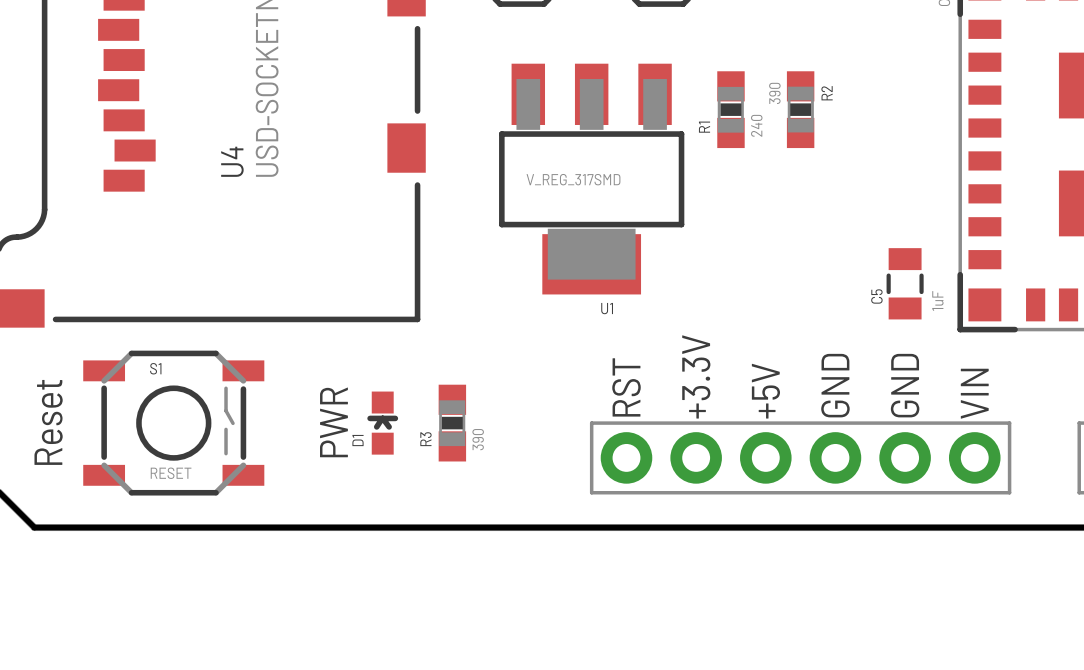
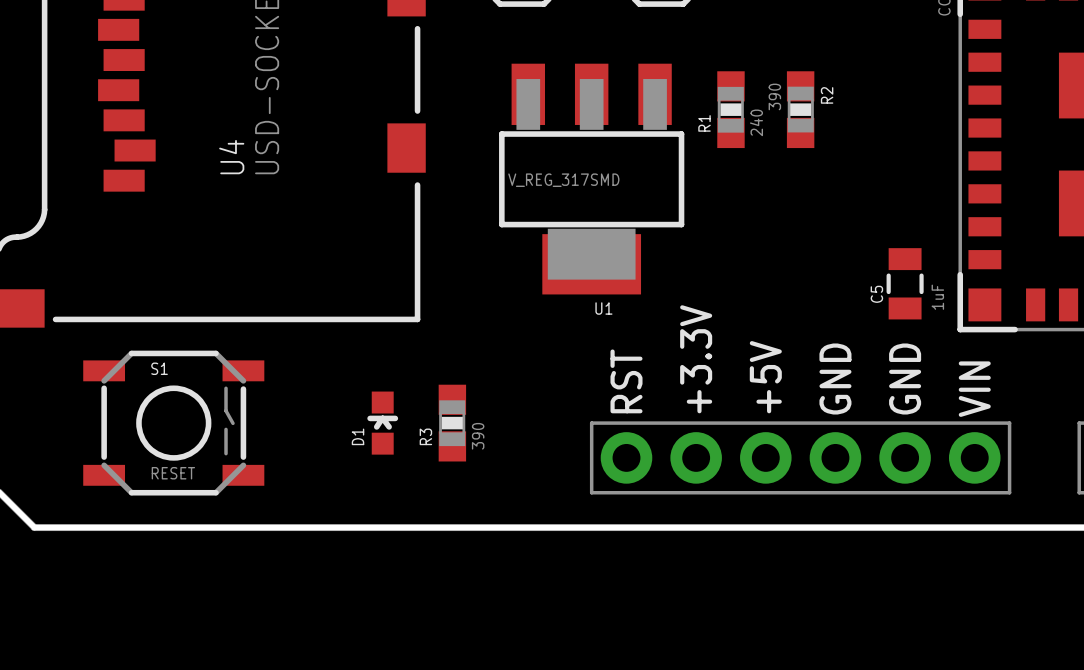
text: Reset (48, 422) -> none
text: PWR (333, 422) -> none

